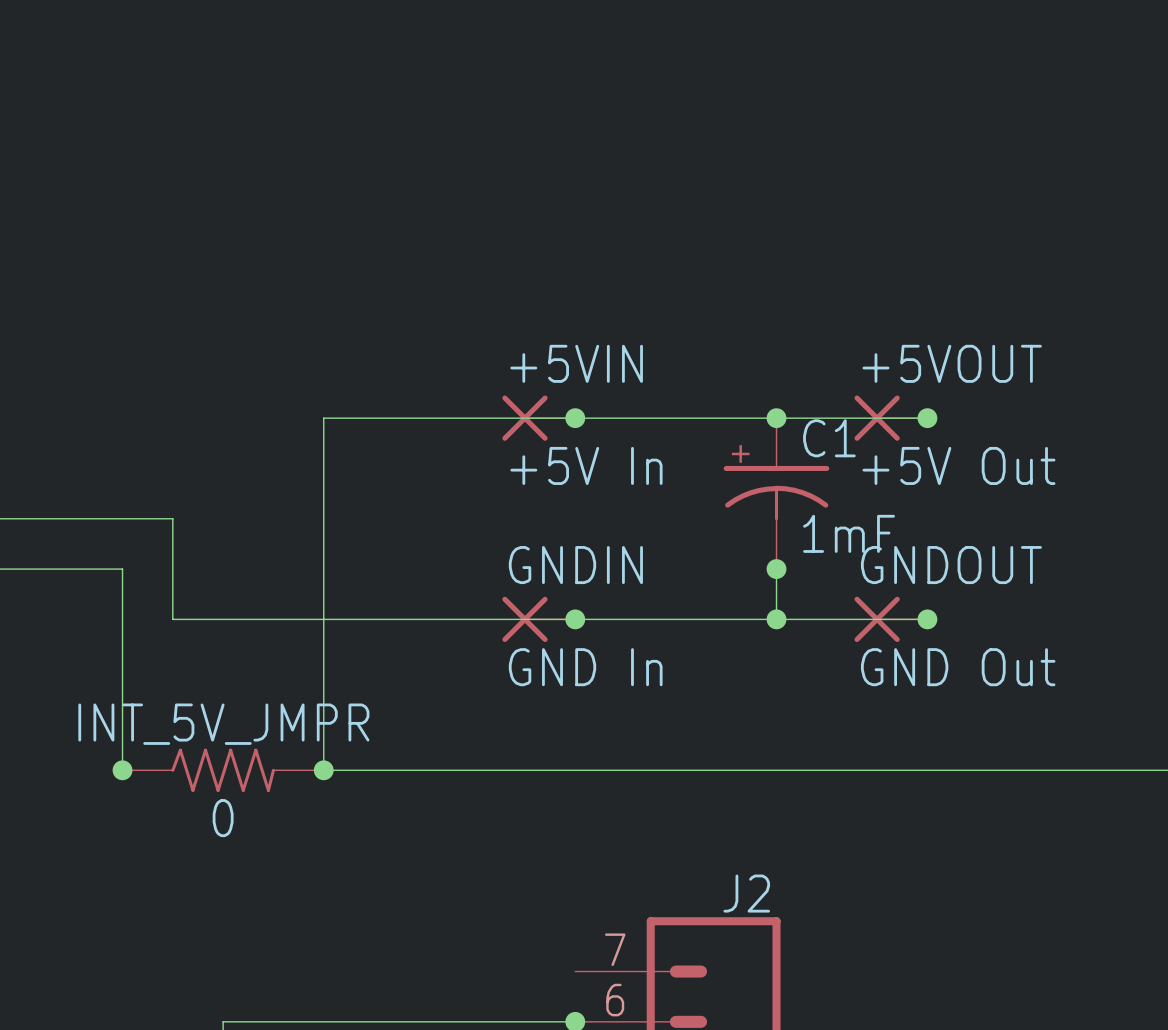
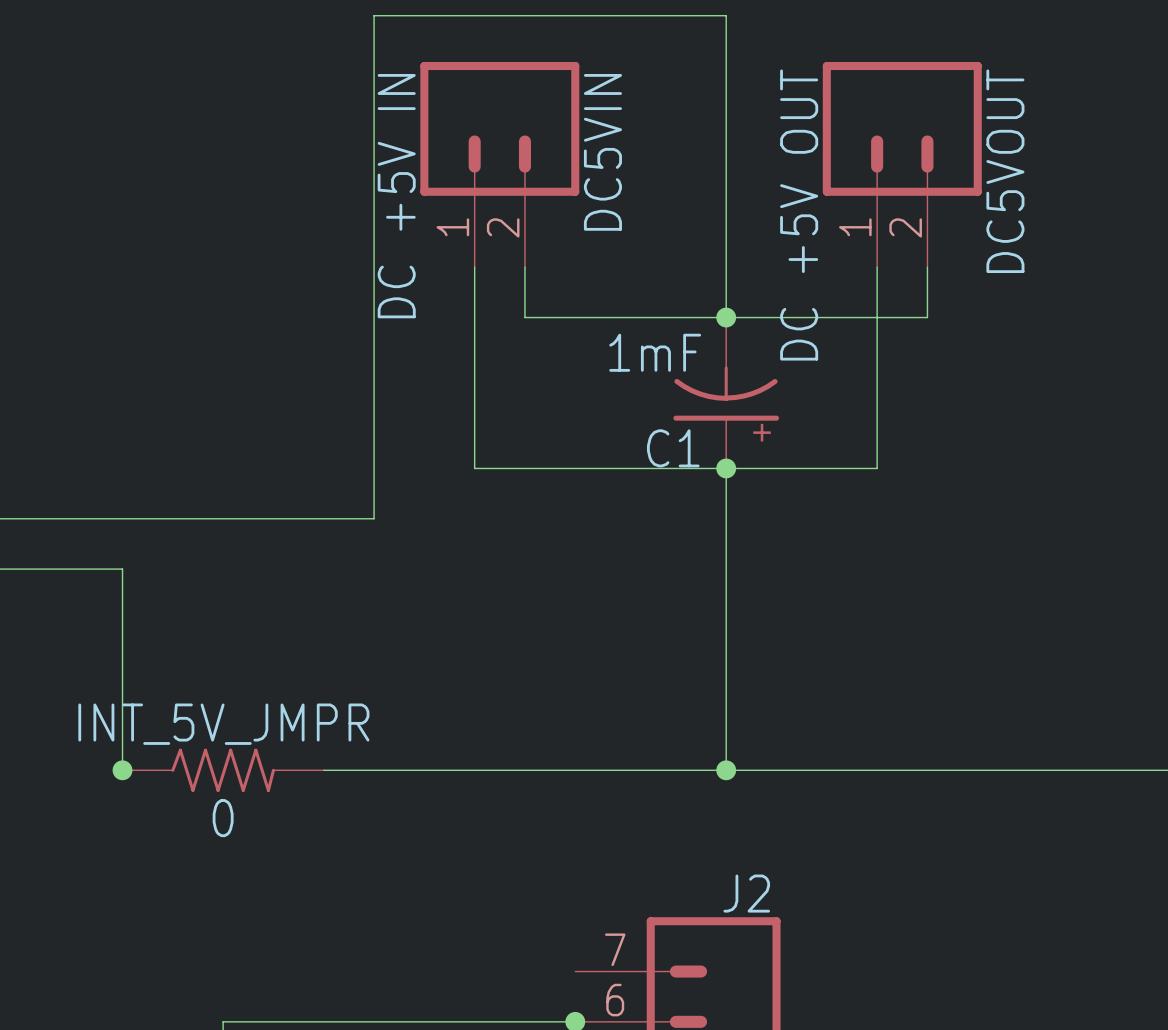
DC5VIN: none -> DC +5V IN (499, 164)
DC5VOUT: none -> DC +5V OUT (902, 164)
wire: none -> (474, 267) (474, 468) (877, 468) (877, 267)
wire: none -> (524, 267) (524, 317) (927, 317) (927, 267)
junction: none -> (726, 317)
+5VIN: +5V In (538, 418) -> none
junction: (575, 418) -> none
junction: (776, 418) -> none
+5VOUT: +5V Out (890, 418) -> none
wire: (927, 418) (323, 418) (323, 770) -> none
junction: (927, 418) -> none
wire: none -> (726, 468) (726, 770)
junction: none -> (726, 468)
C1 rotation: 0° (776, 482) -> 180° (726, 403)
C1 position: (776, 493) -> (726, 393)
wire: (172, 518) (172, 619) (927, 619) -> (172, 518) (374, 518) (374, 15) (726, 15) (726, 317)
wire: (776, 569) (776, 619) -> none
junction: (776, 569) -> none
GNDIN: GND In (538, 619) -> none
junction: (575, 619) -> none
junction: (776, 619) -> none
GNDOUT: GND Out (890, 619) -> none
junction: (927, 619) -> none
junction: (323, 770) -> none
junction: none -> (726, 770)

